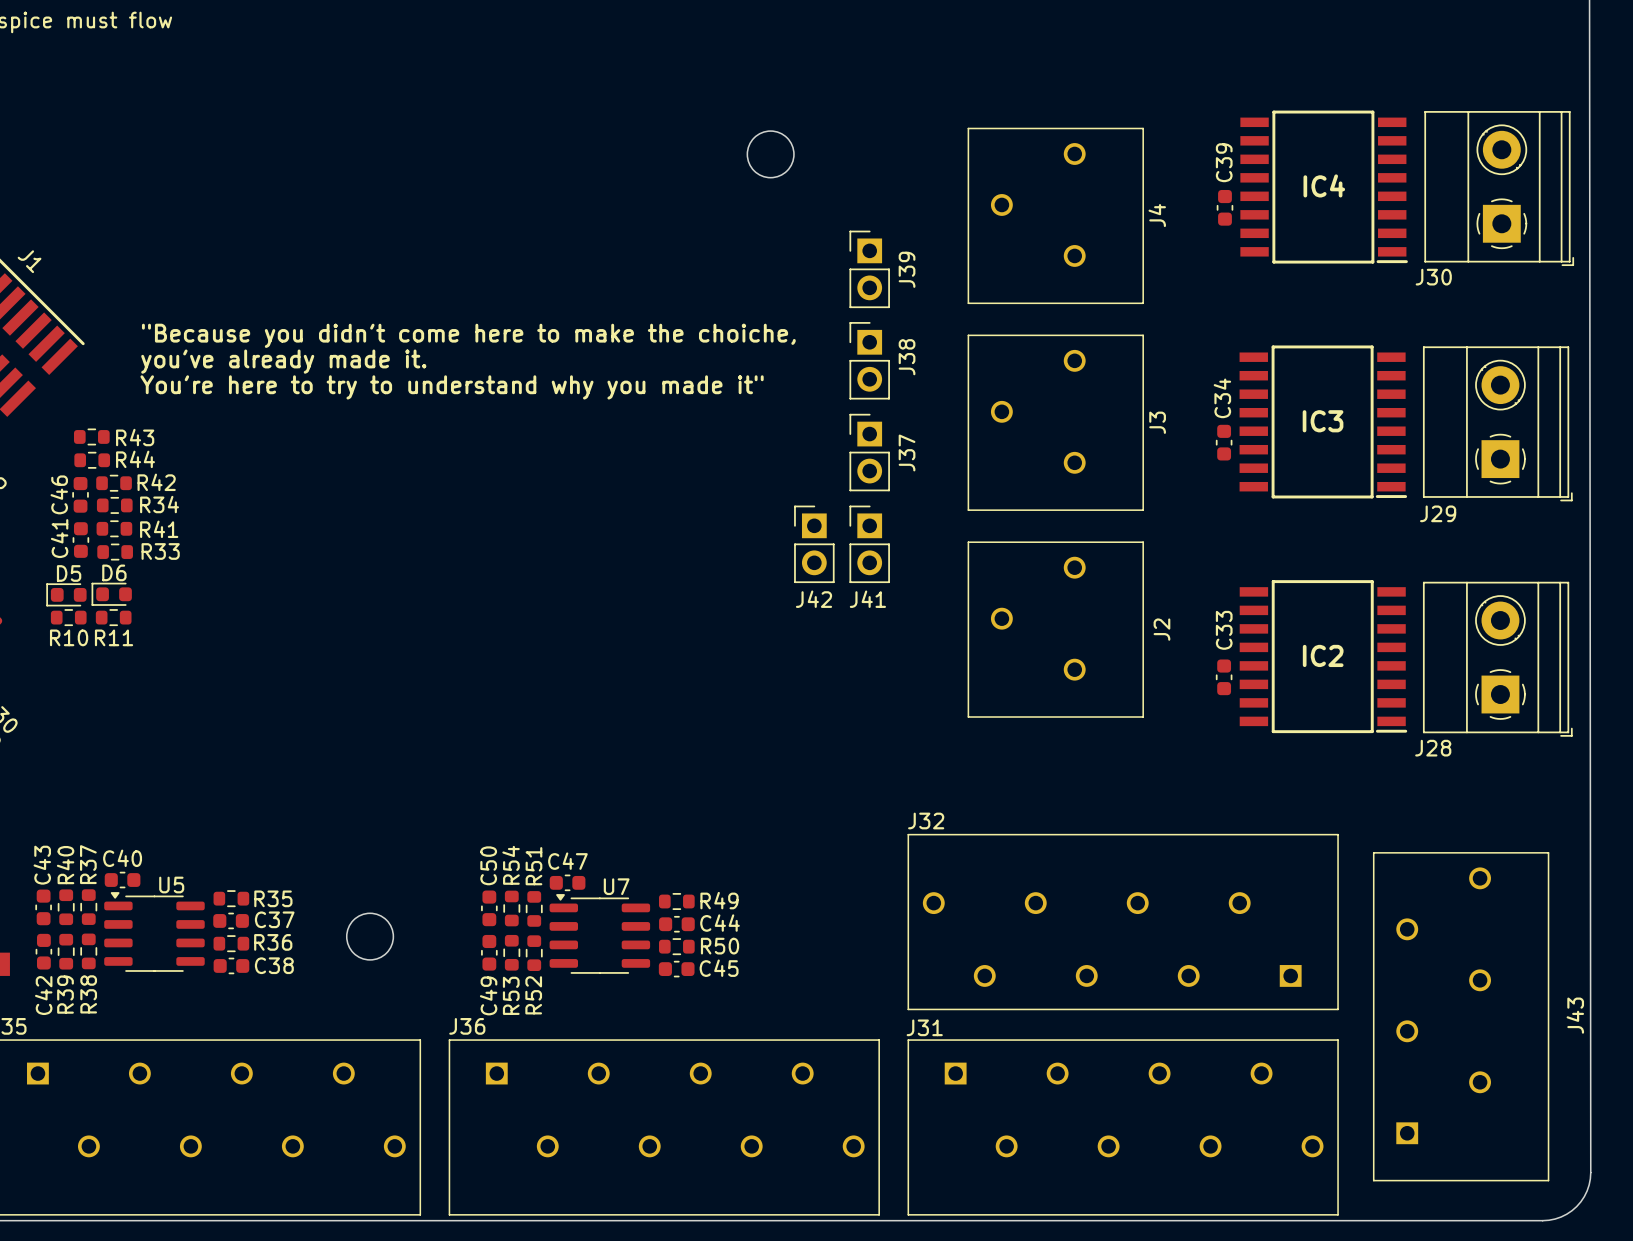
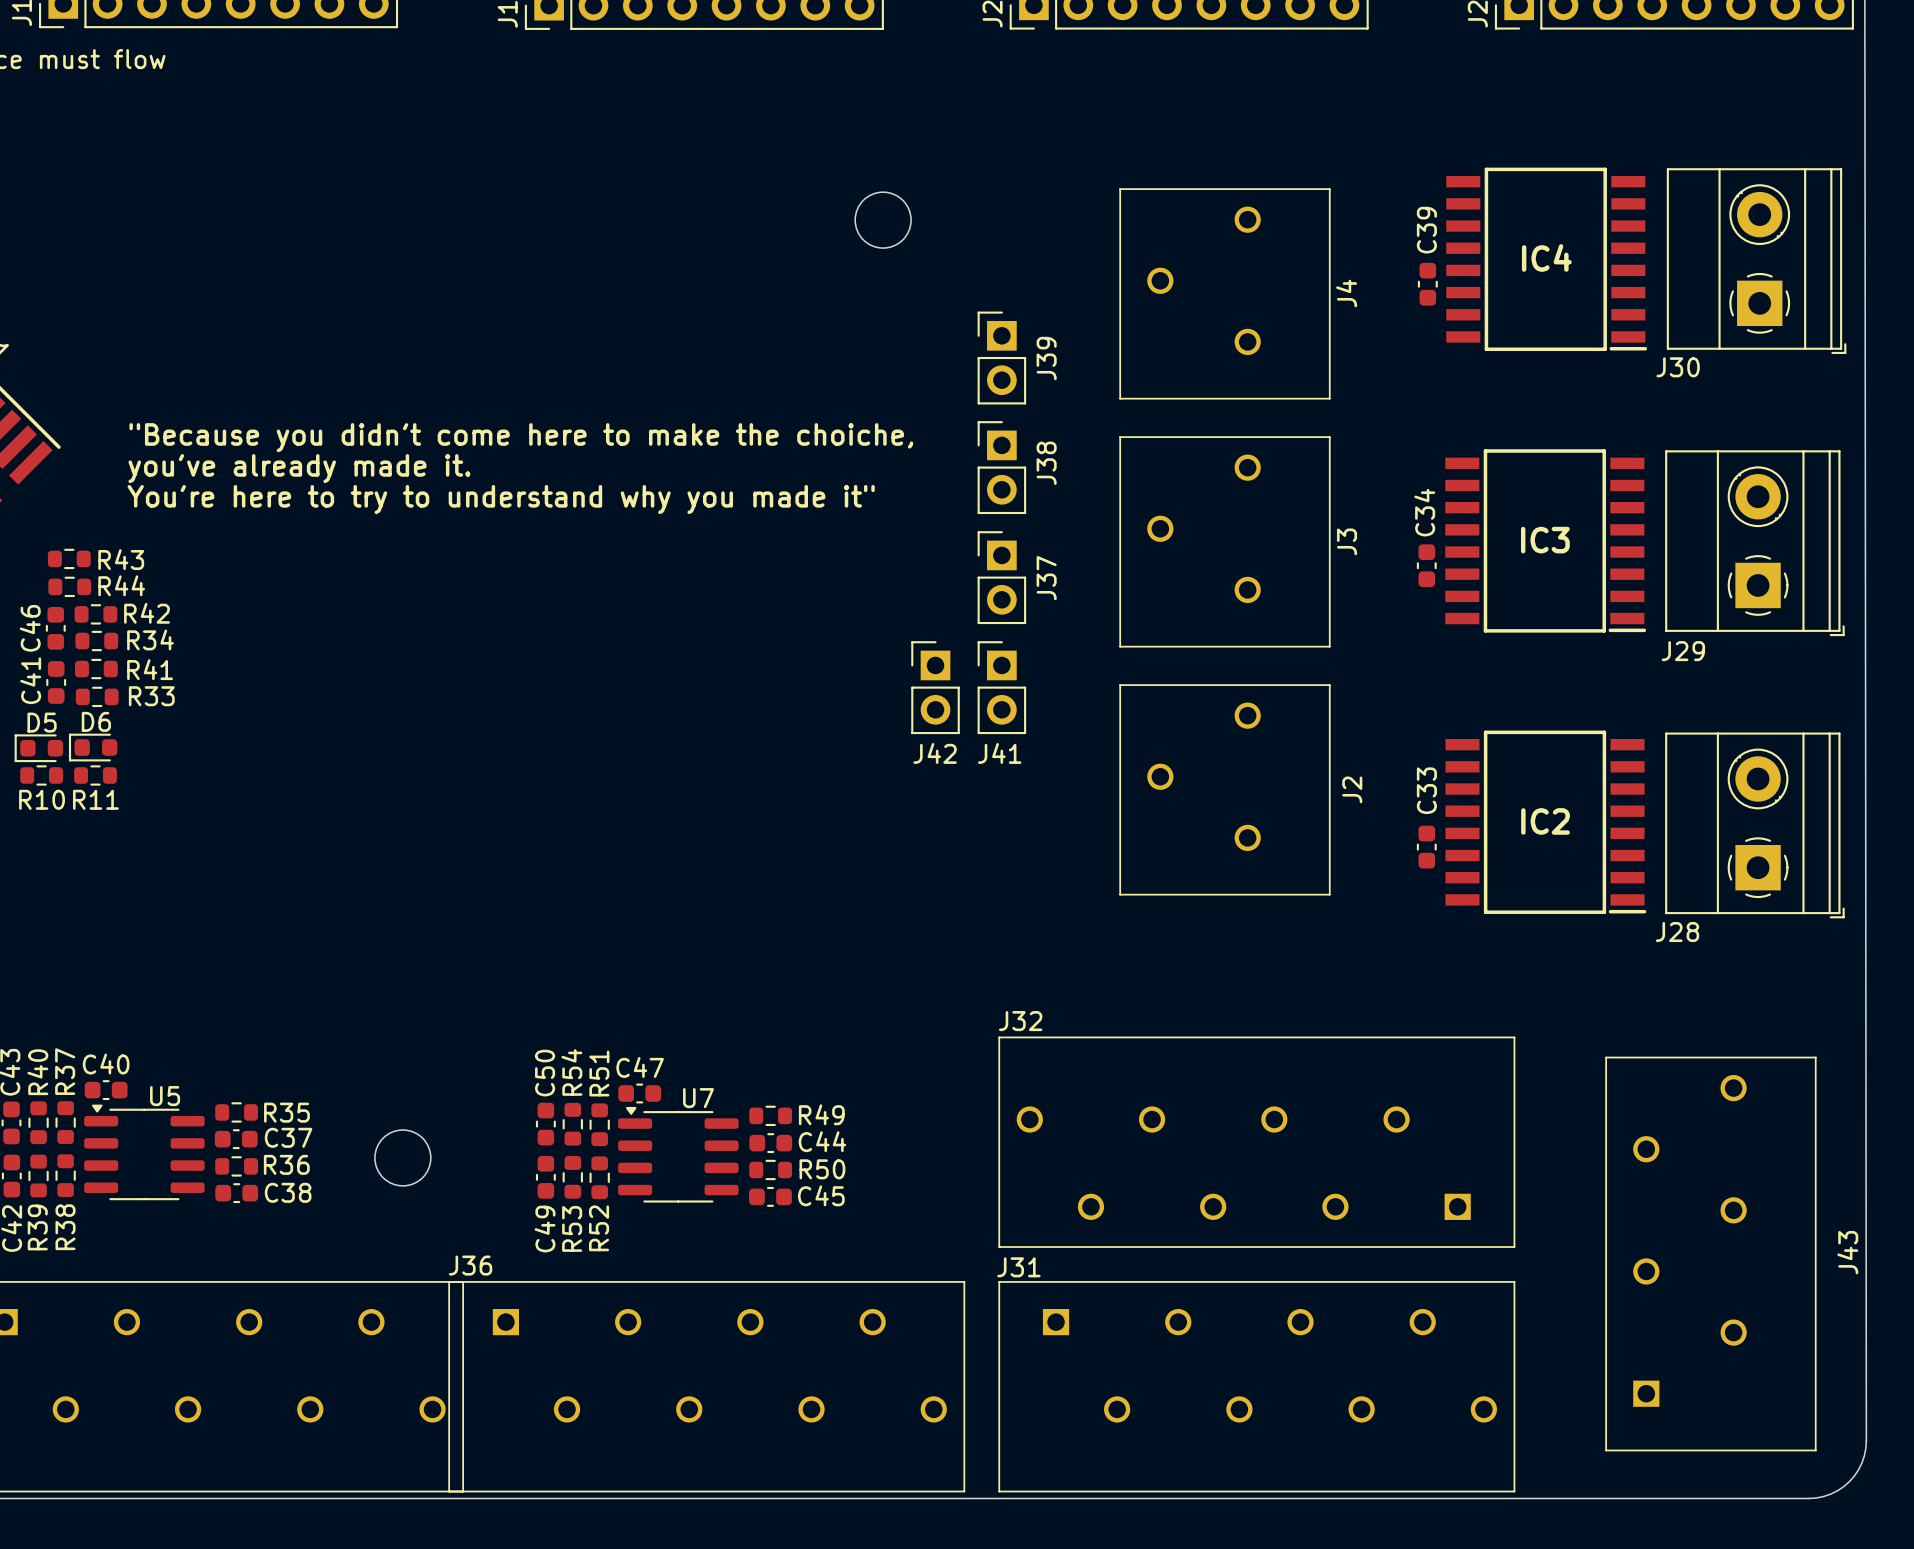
J32 position: (1123, 922) -> (1256, 1142)
J36 position: (664, 1127) -> (706, 1386)
J31 position: (1123, 1127) -> (1256, 1386)

